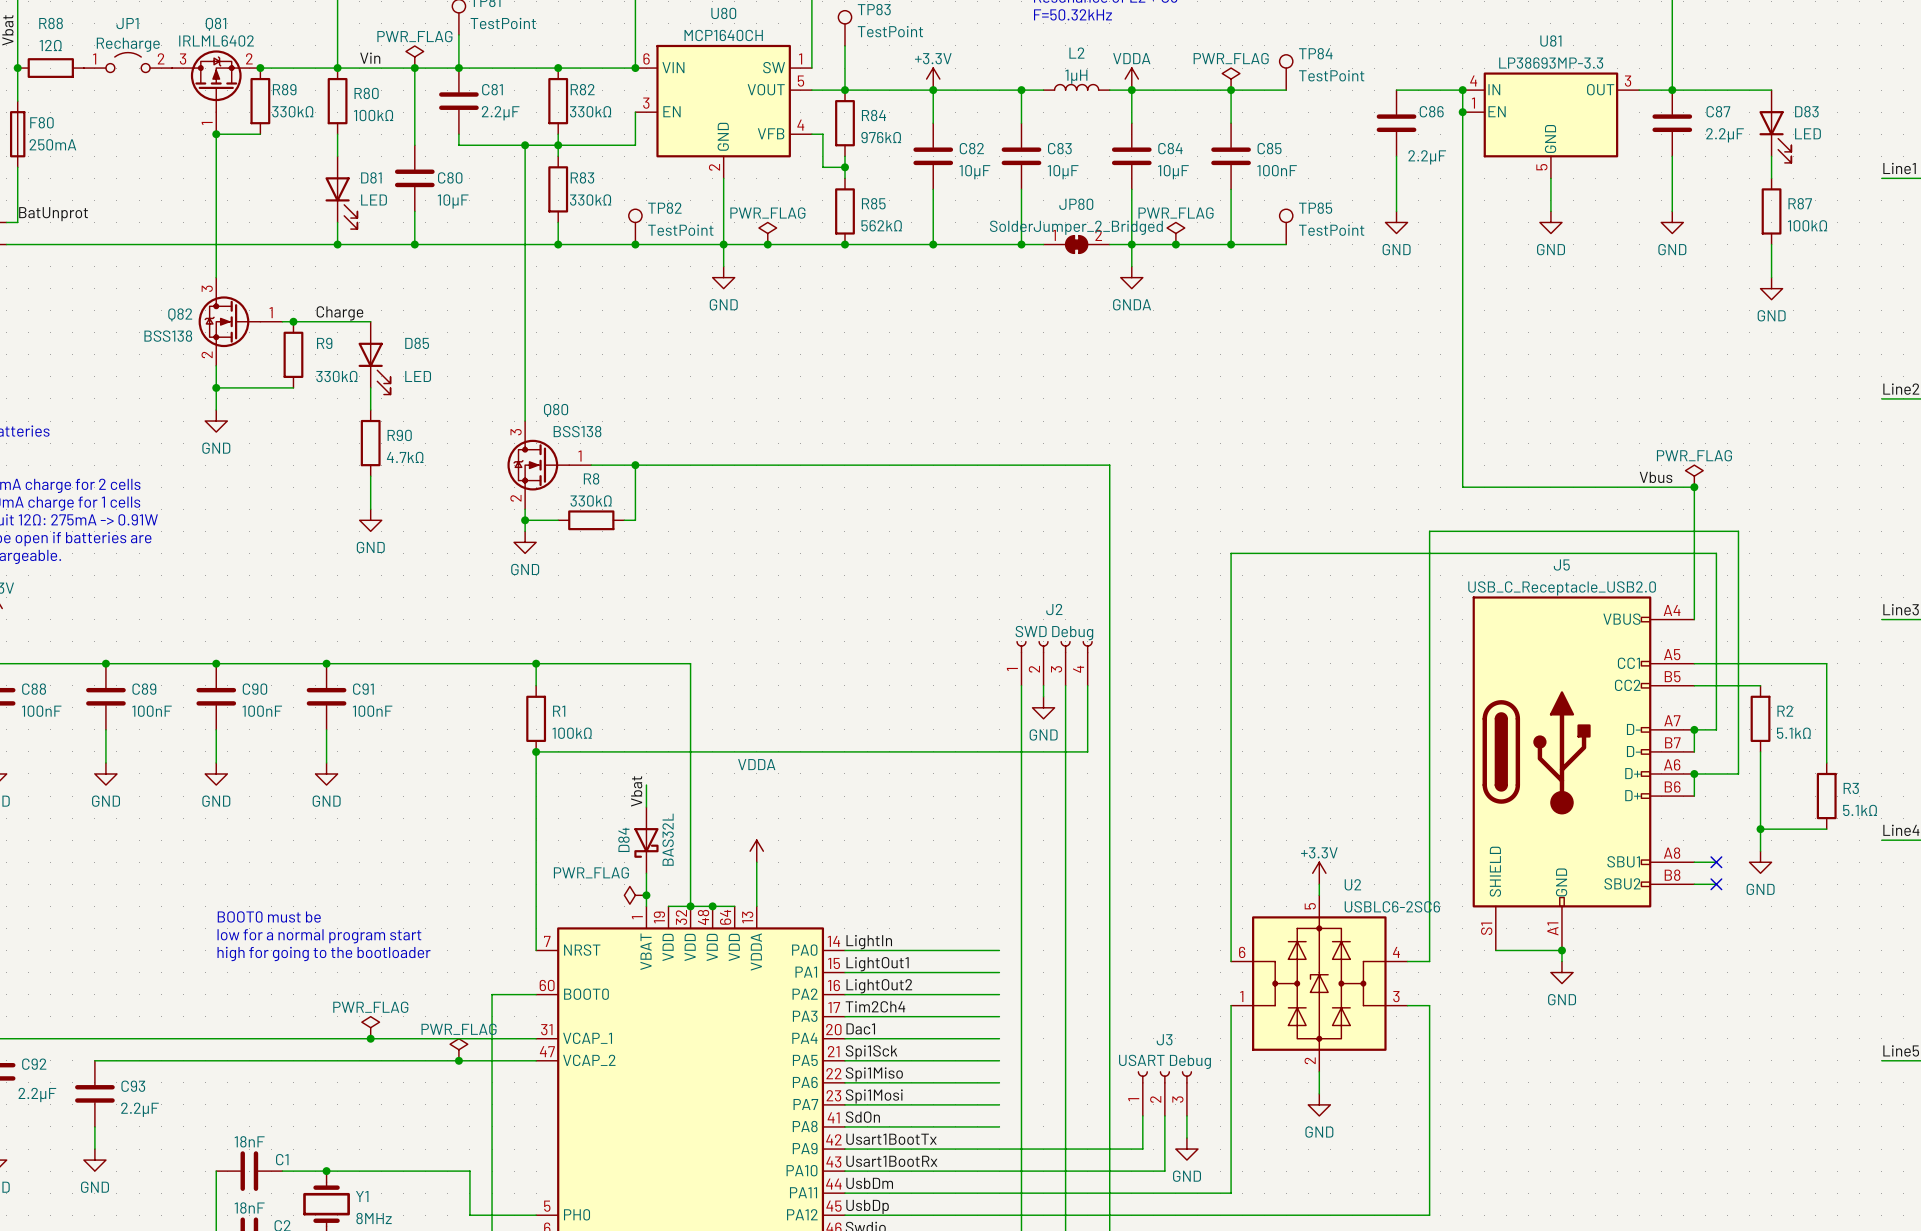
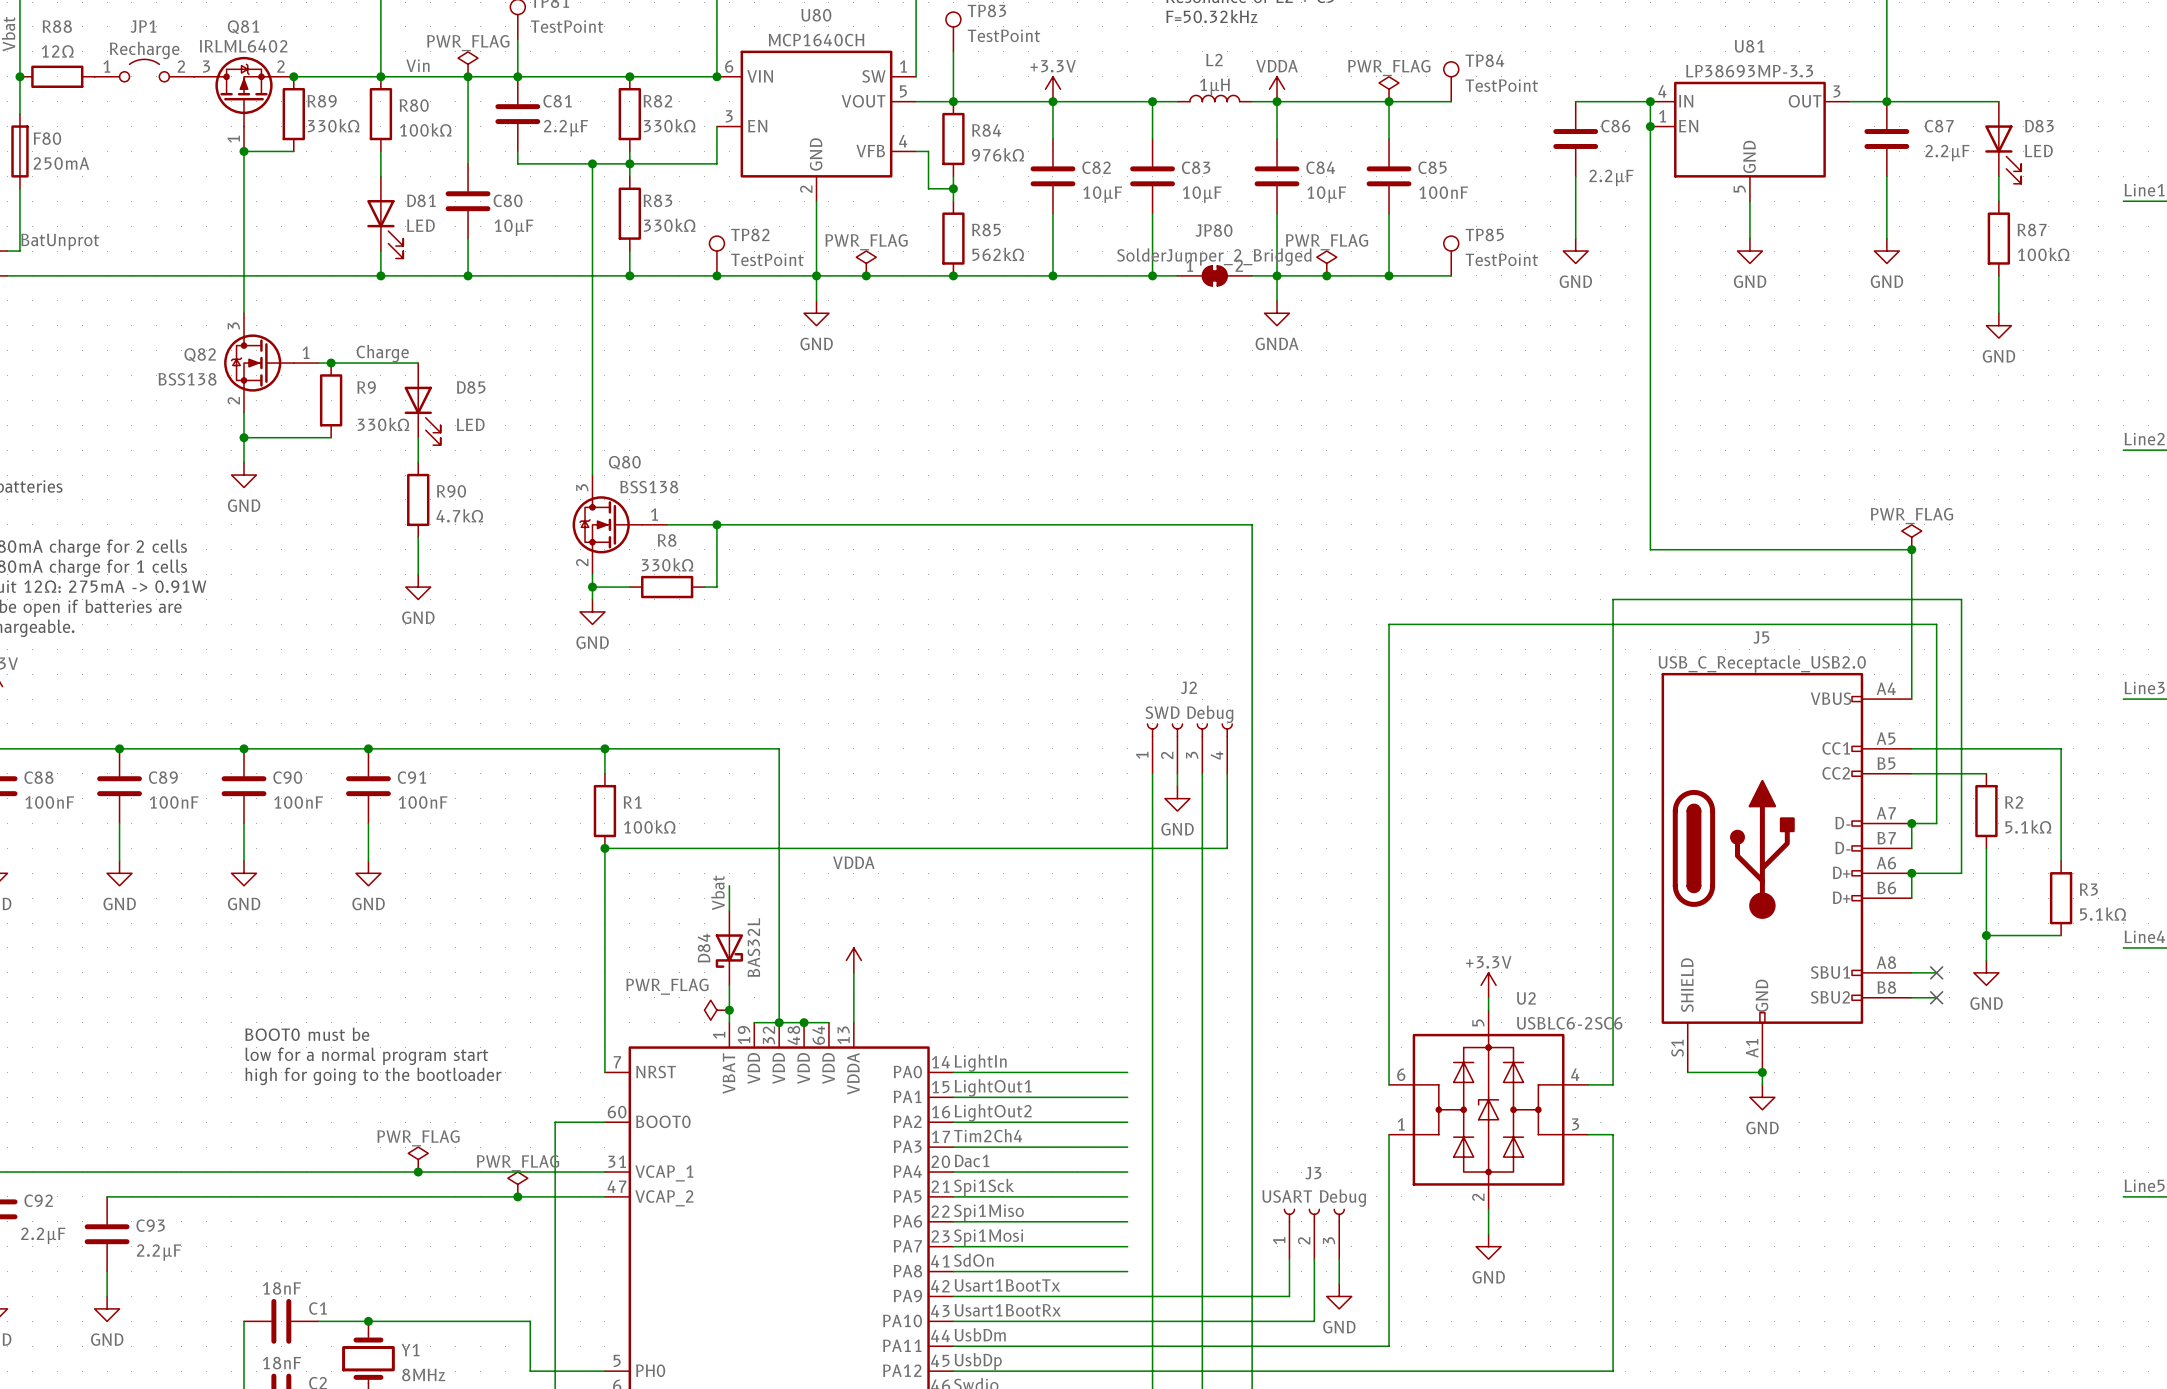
label: Vbus (1656, 477) -> none

